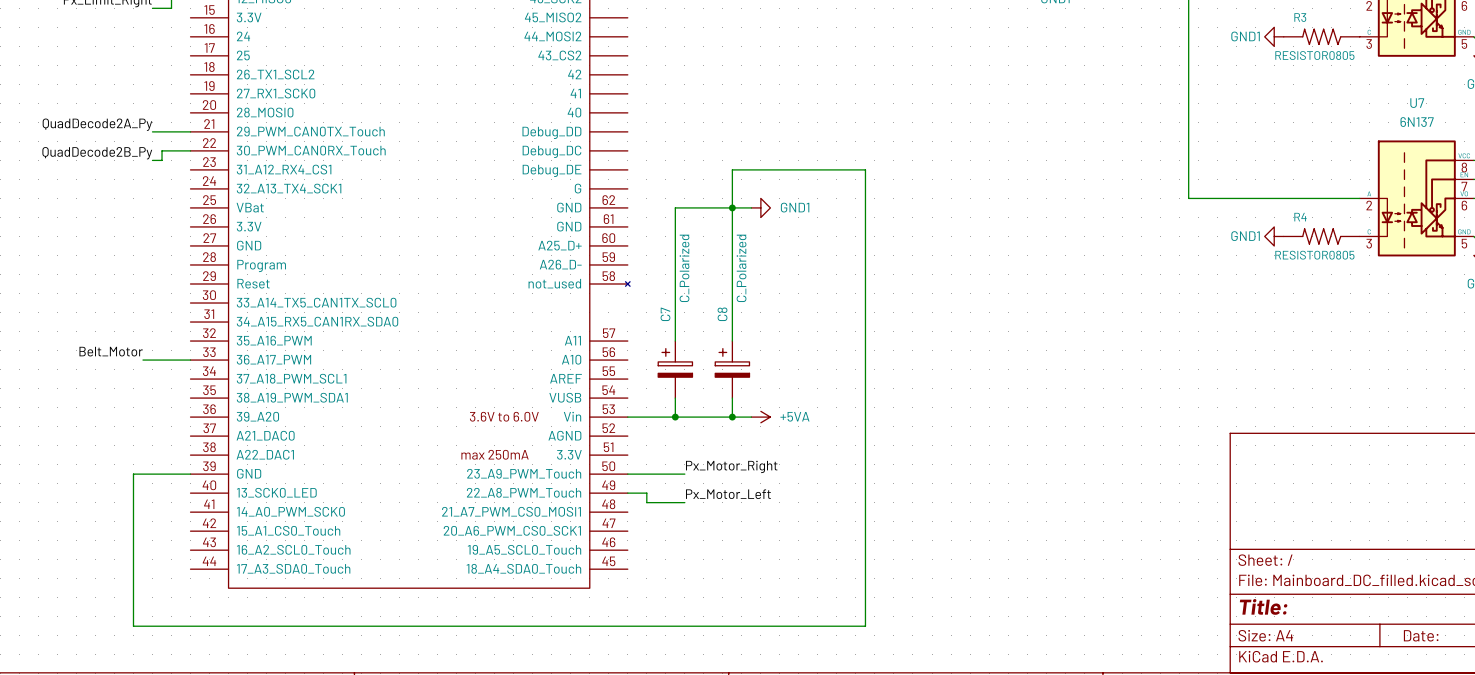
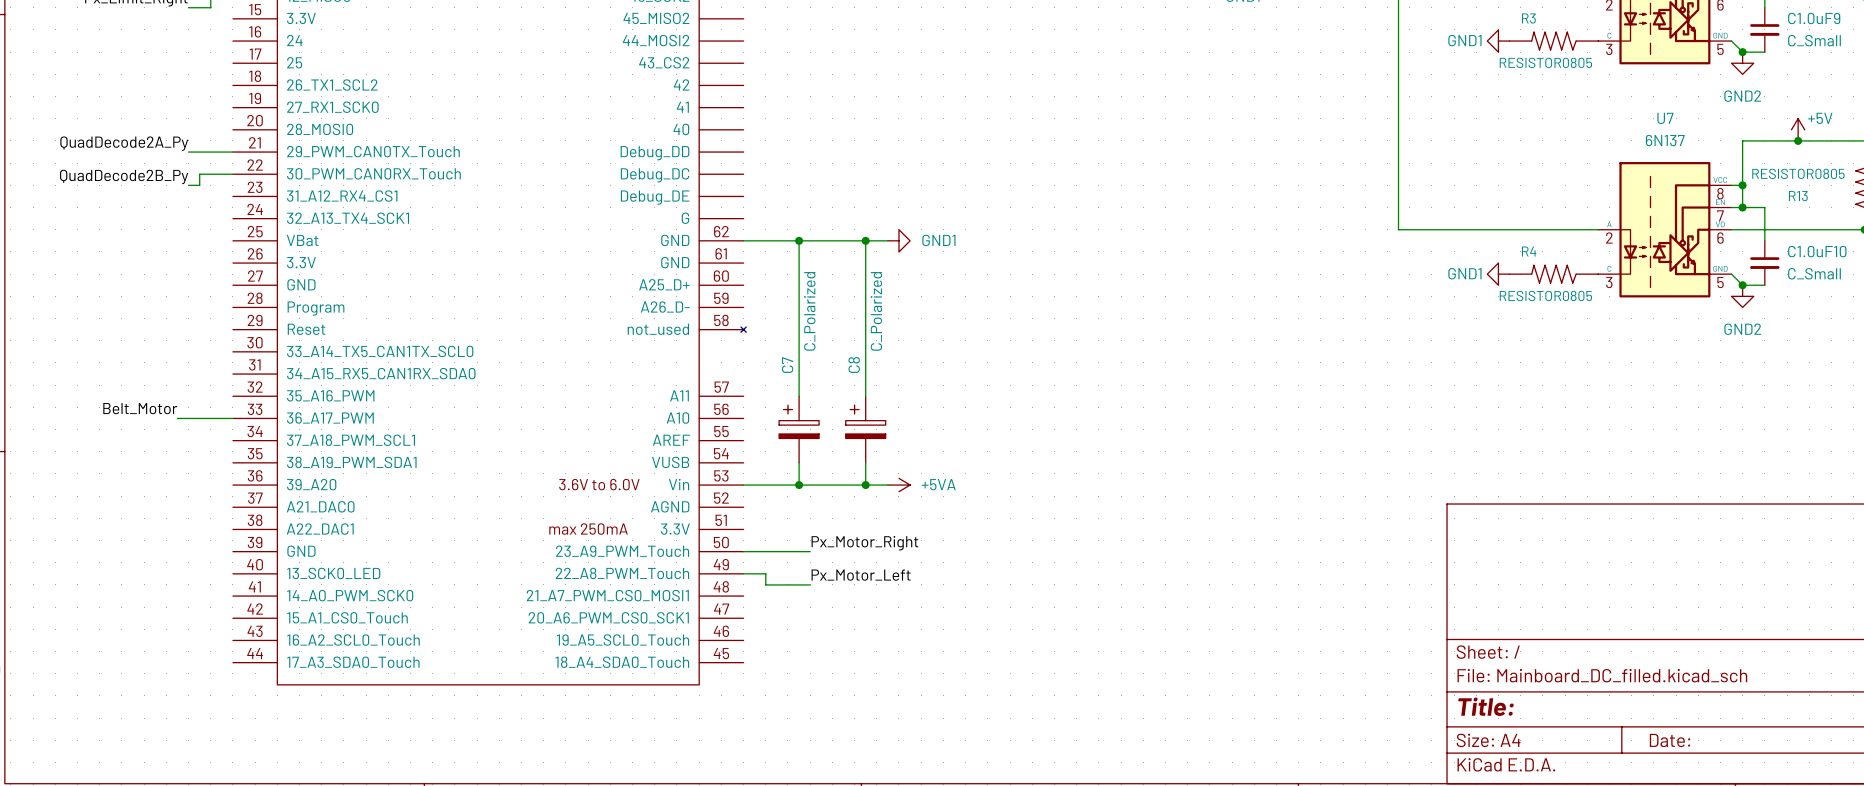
wire: none -> (743, 240) (799, 240)
junction: none -> (799, 240)
wire: (732, 207) (732, 169) (865, 169) (865, 626) (133, 626) (133, 474) (190, 474) -> none

